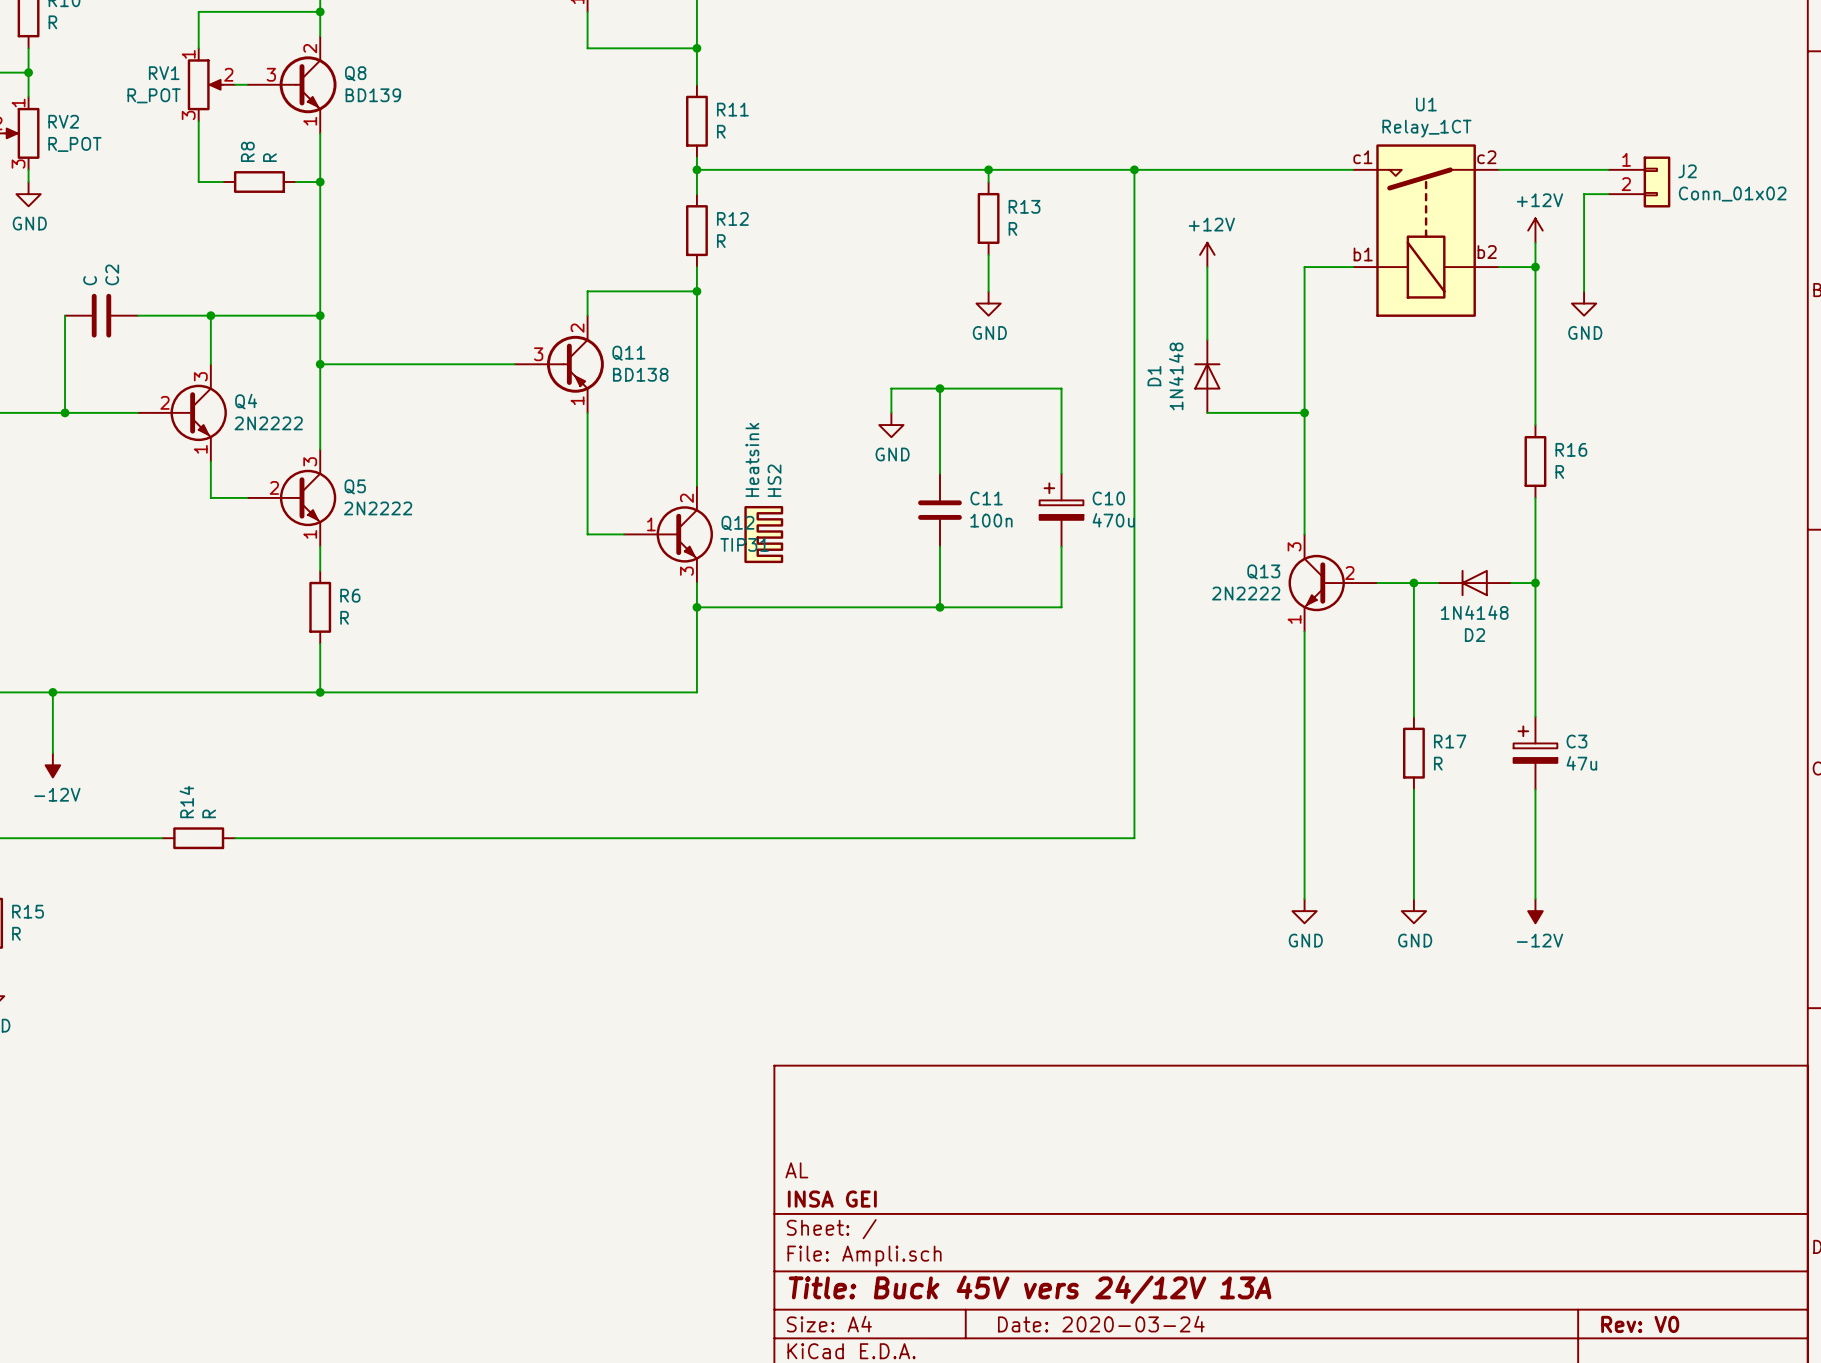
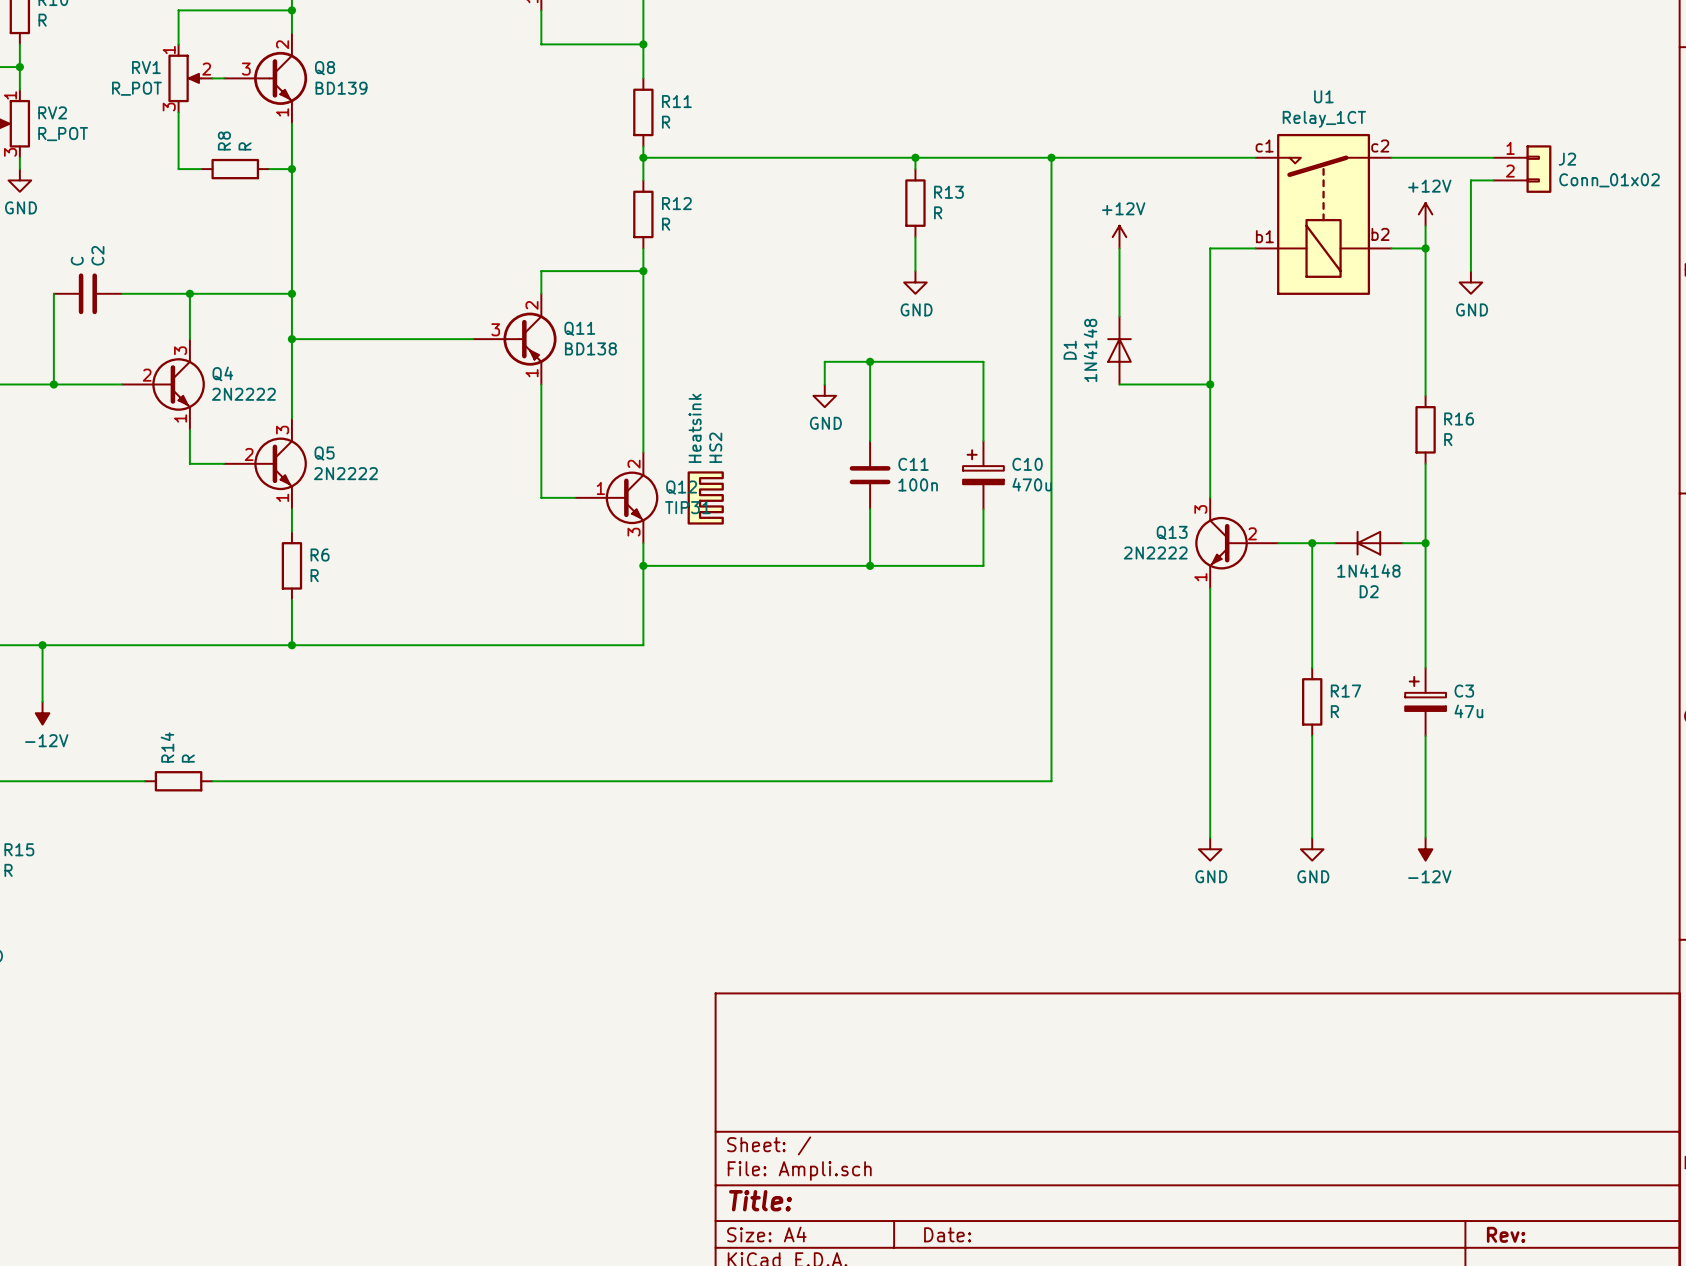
title block: AL (796, 1170) -> none
title block: INSA GEI (832, 1199) -> none
title block: Title: Buck 45V vers 24/12V 13A (1030, 1289) -> Title: (760, 1200)
title block: Date: 2020-03-24 (1101, 1324) -> Date: (947, 1234)
title block: Rev: V0 (1640, 1324) -> Rev: (1506, 1234)

